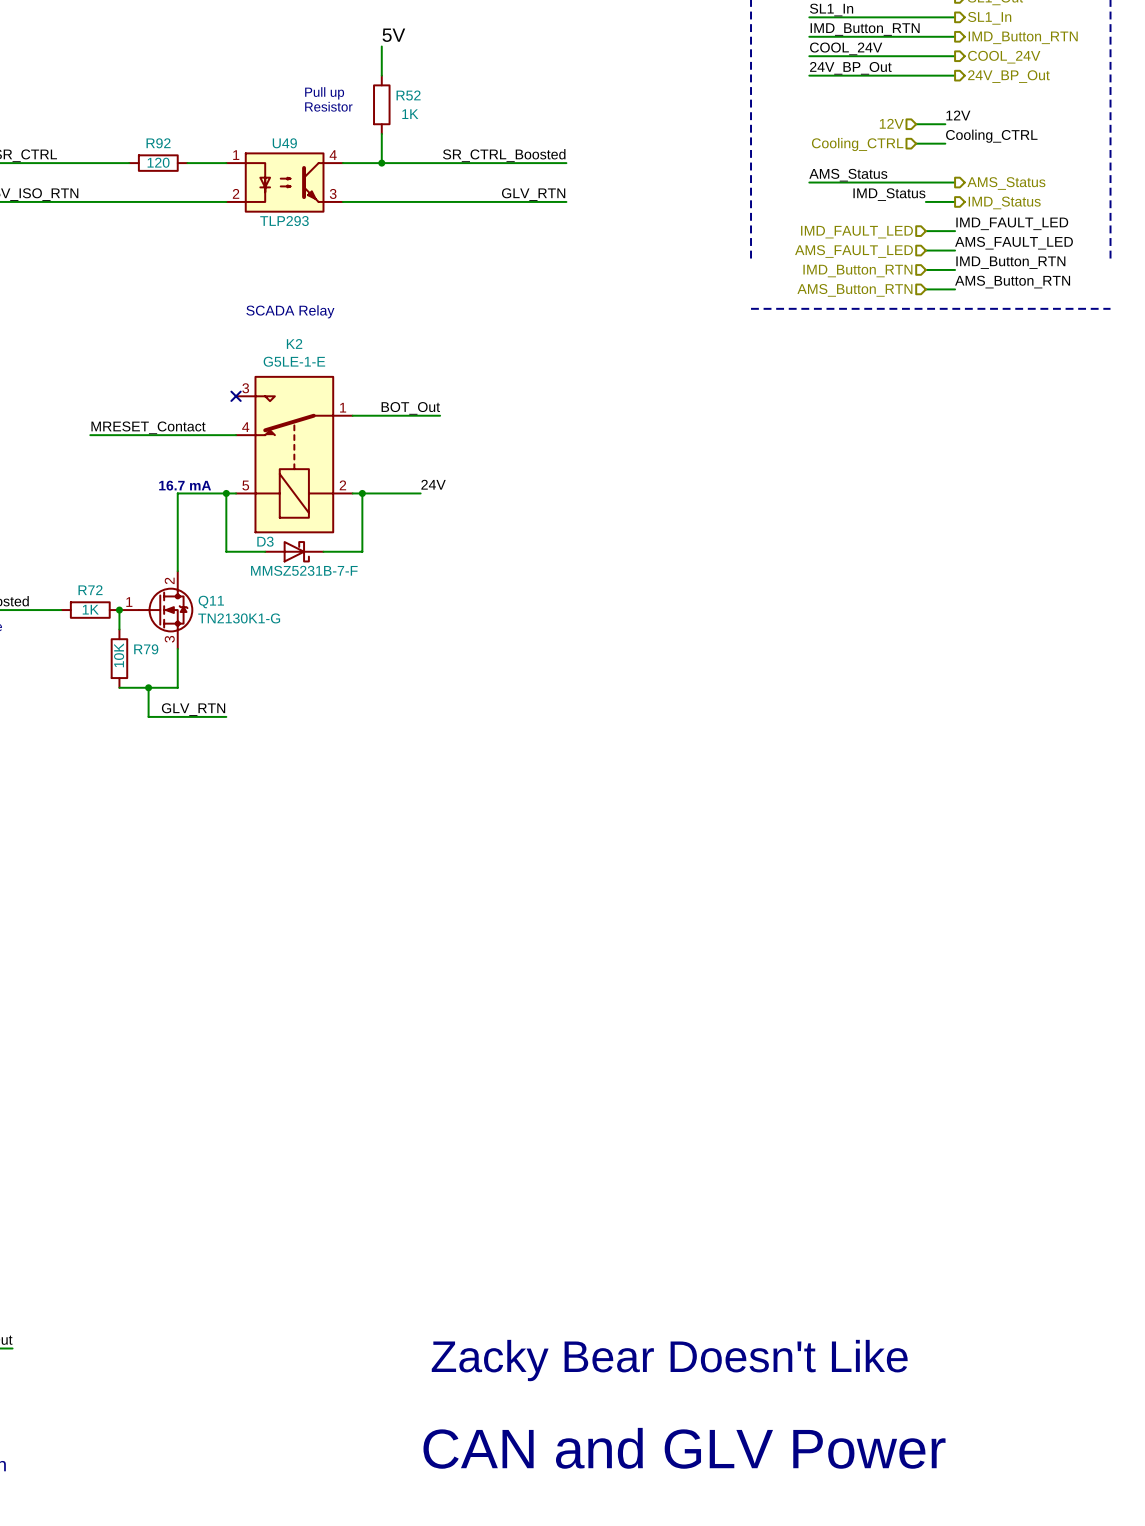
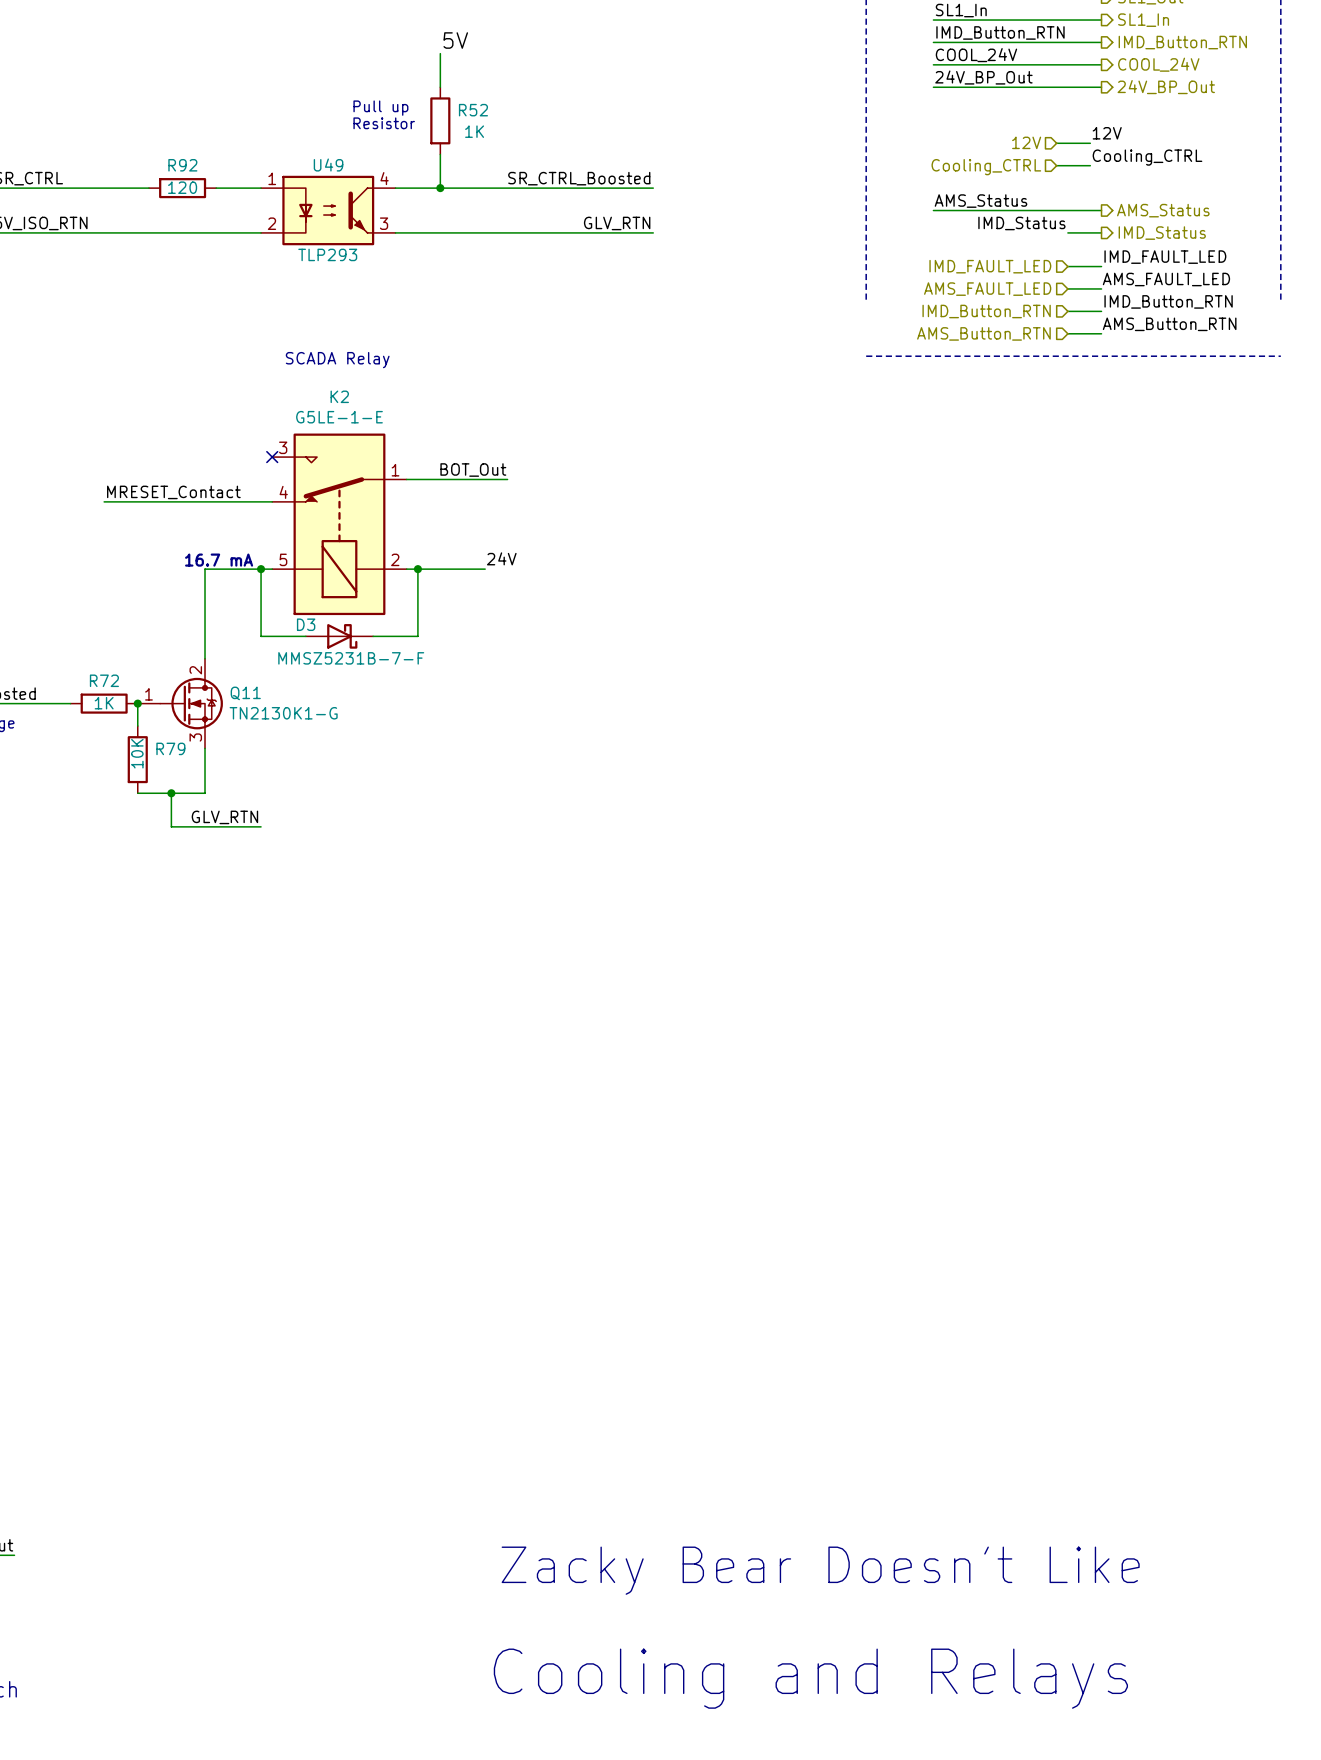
text: CAN and GLV Power (684, 1448) -> Cooling and Relays (810, 1678)

